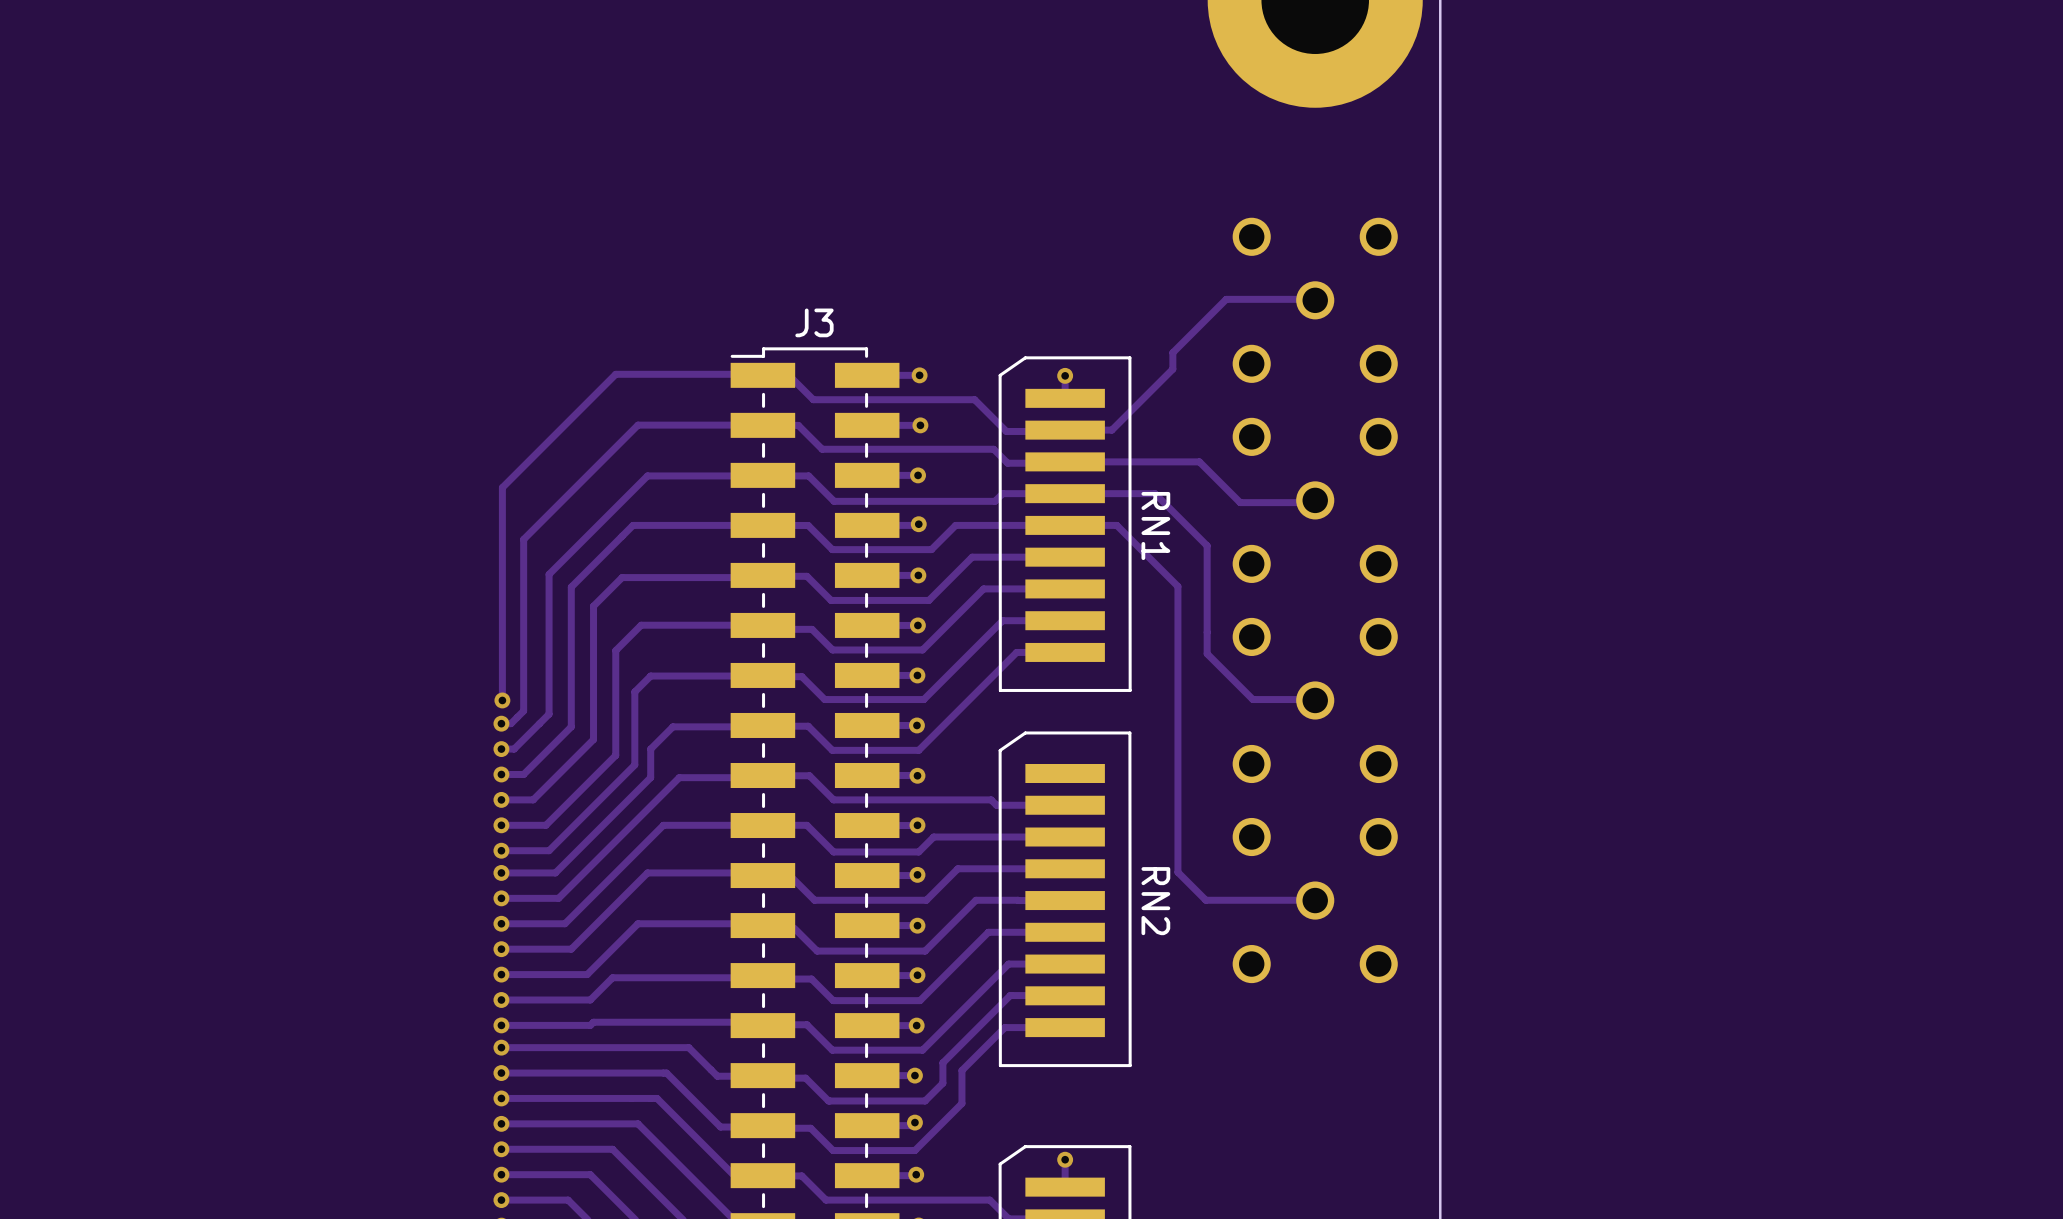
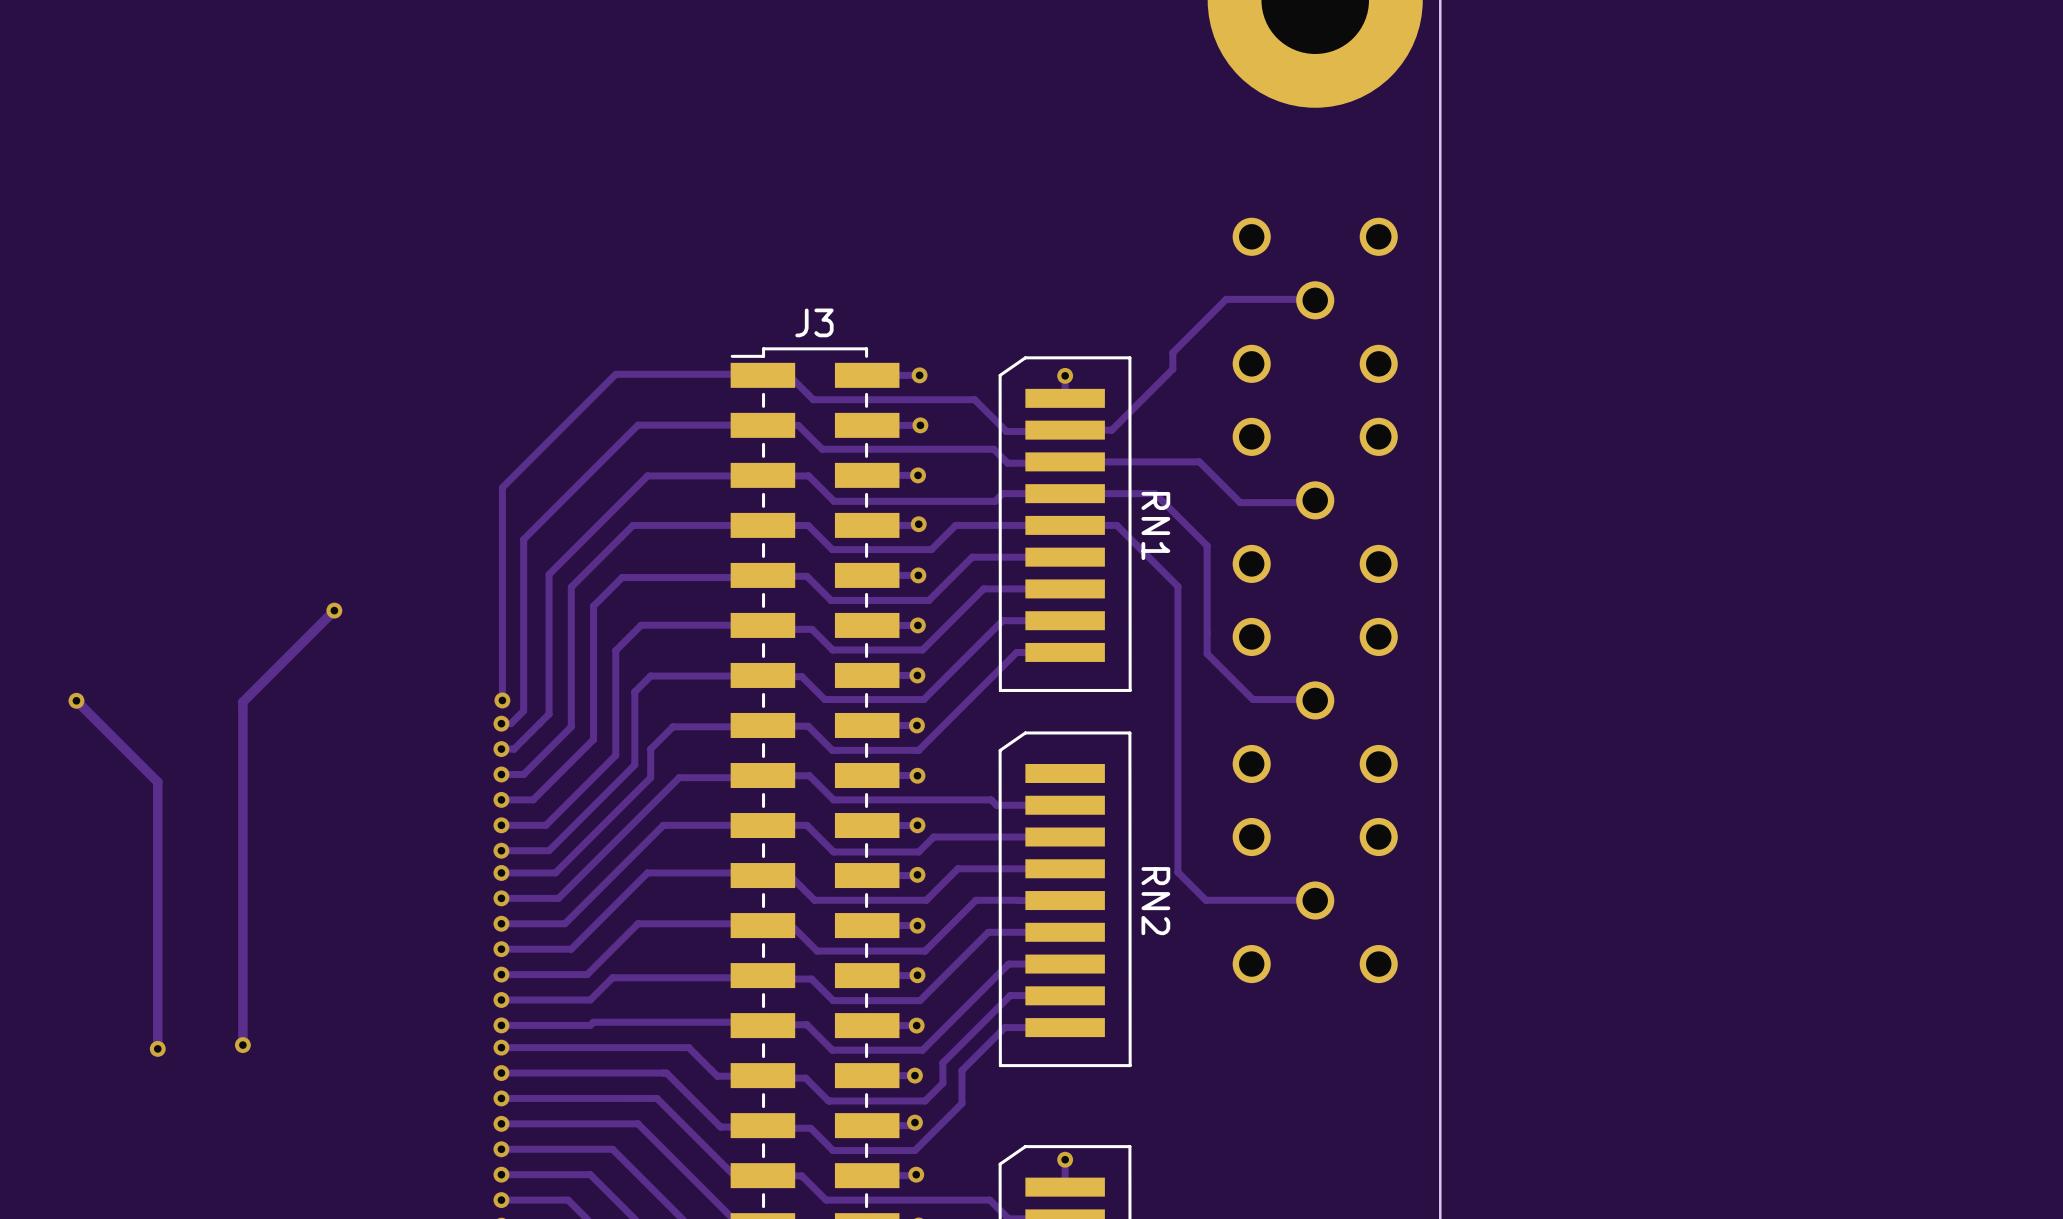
track: none -> (334, 610) (242, 702) (242, 1045)
via: none -> (334, 610)
track: none -> (76, 700) (157, 782) (157, 1048)
via: none -> (76, 700)
via: none -> (242, 1045)
via: none -> (157, 1048)

